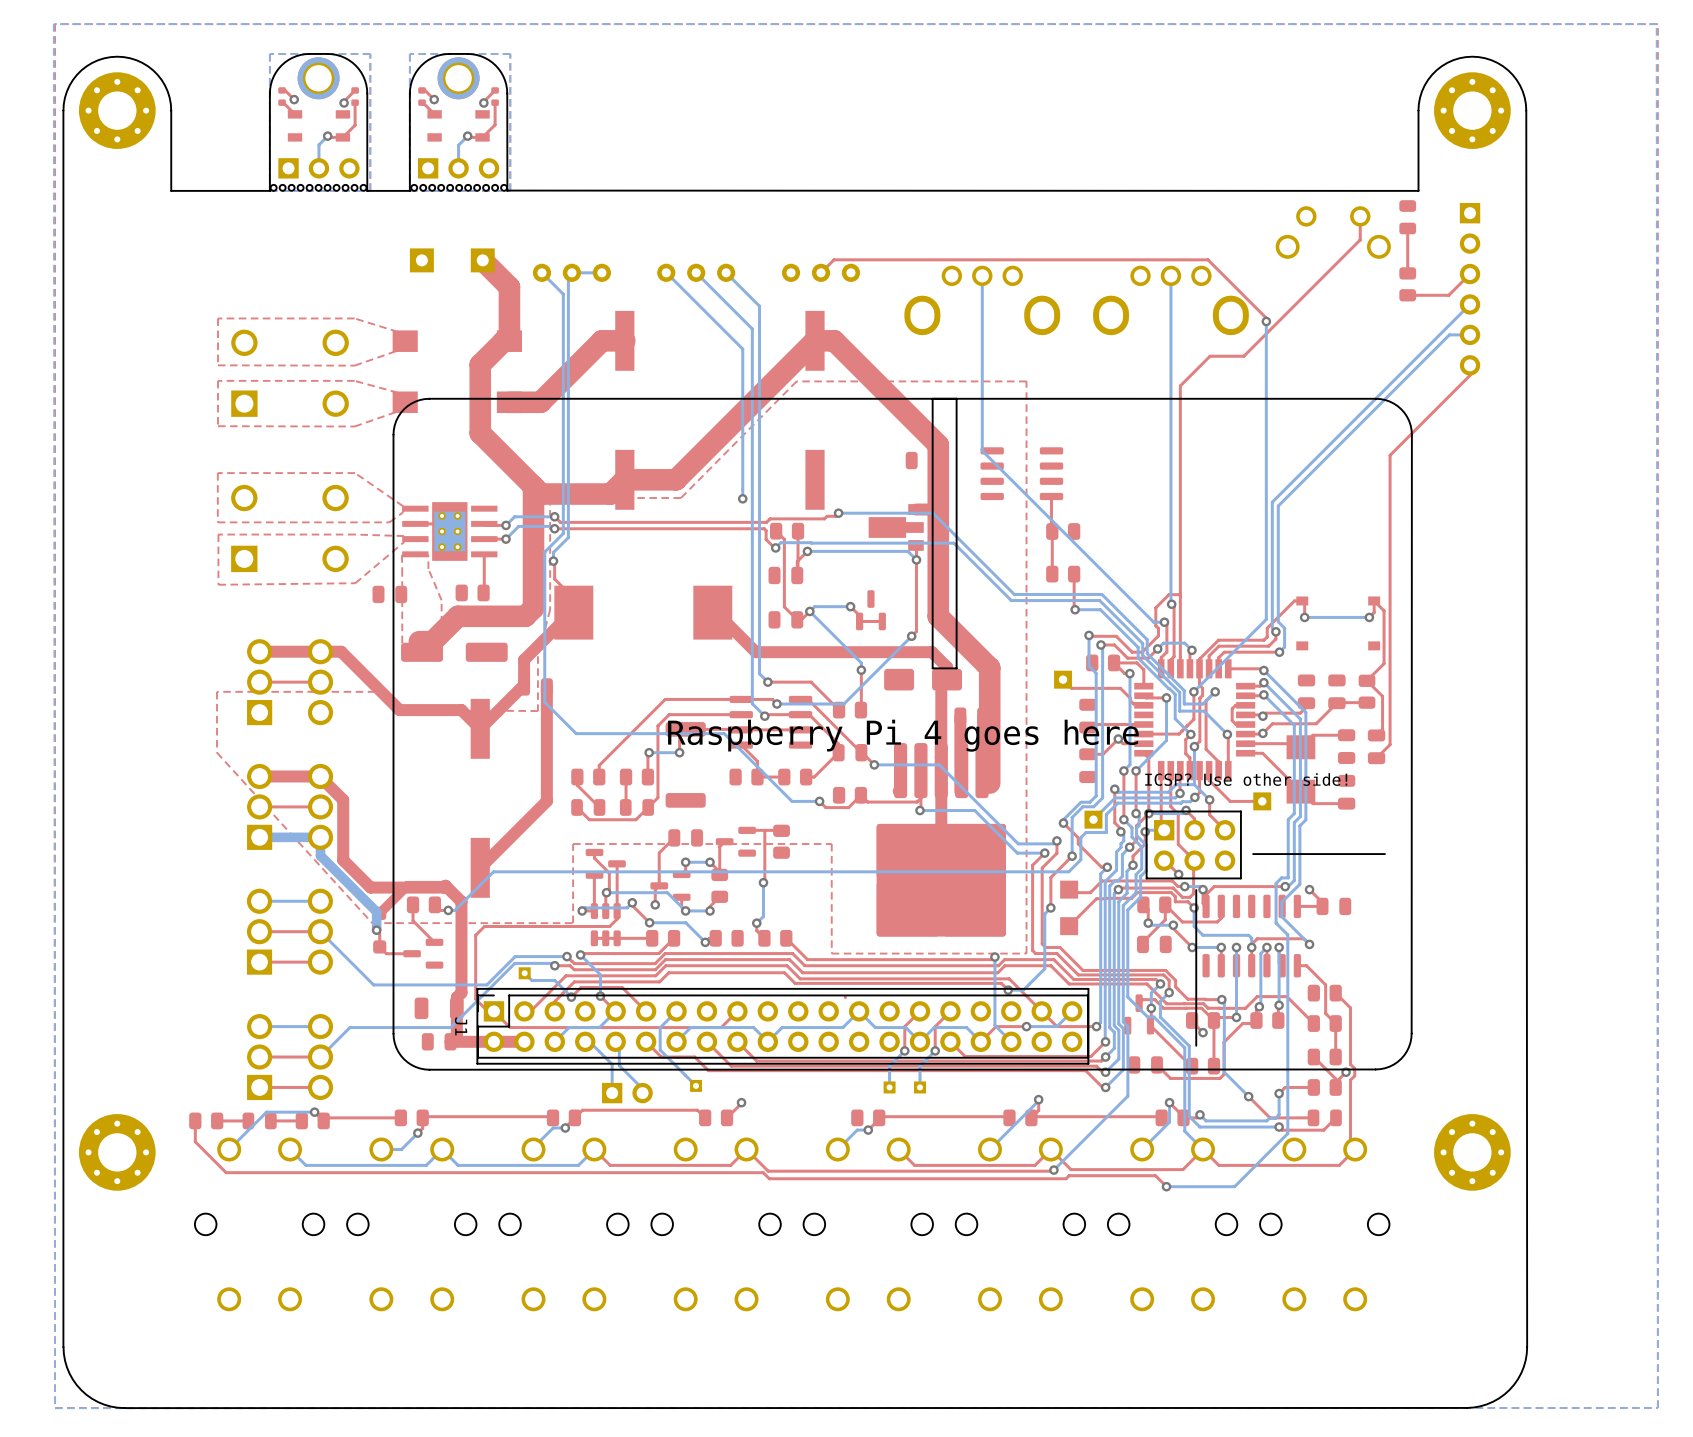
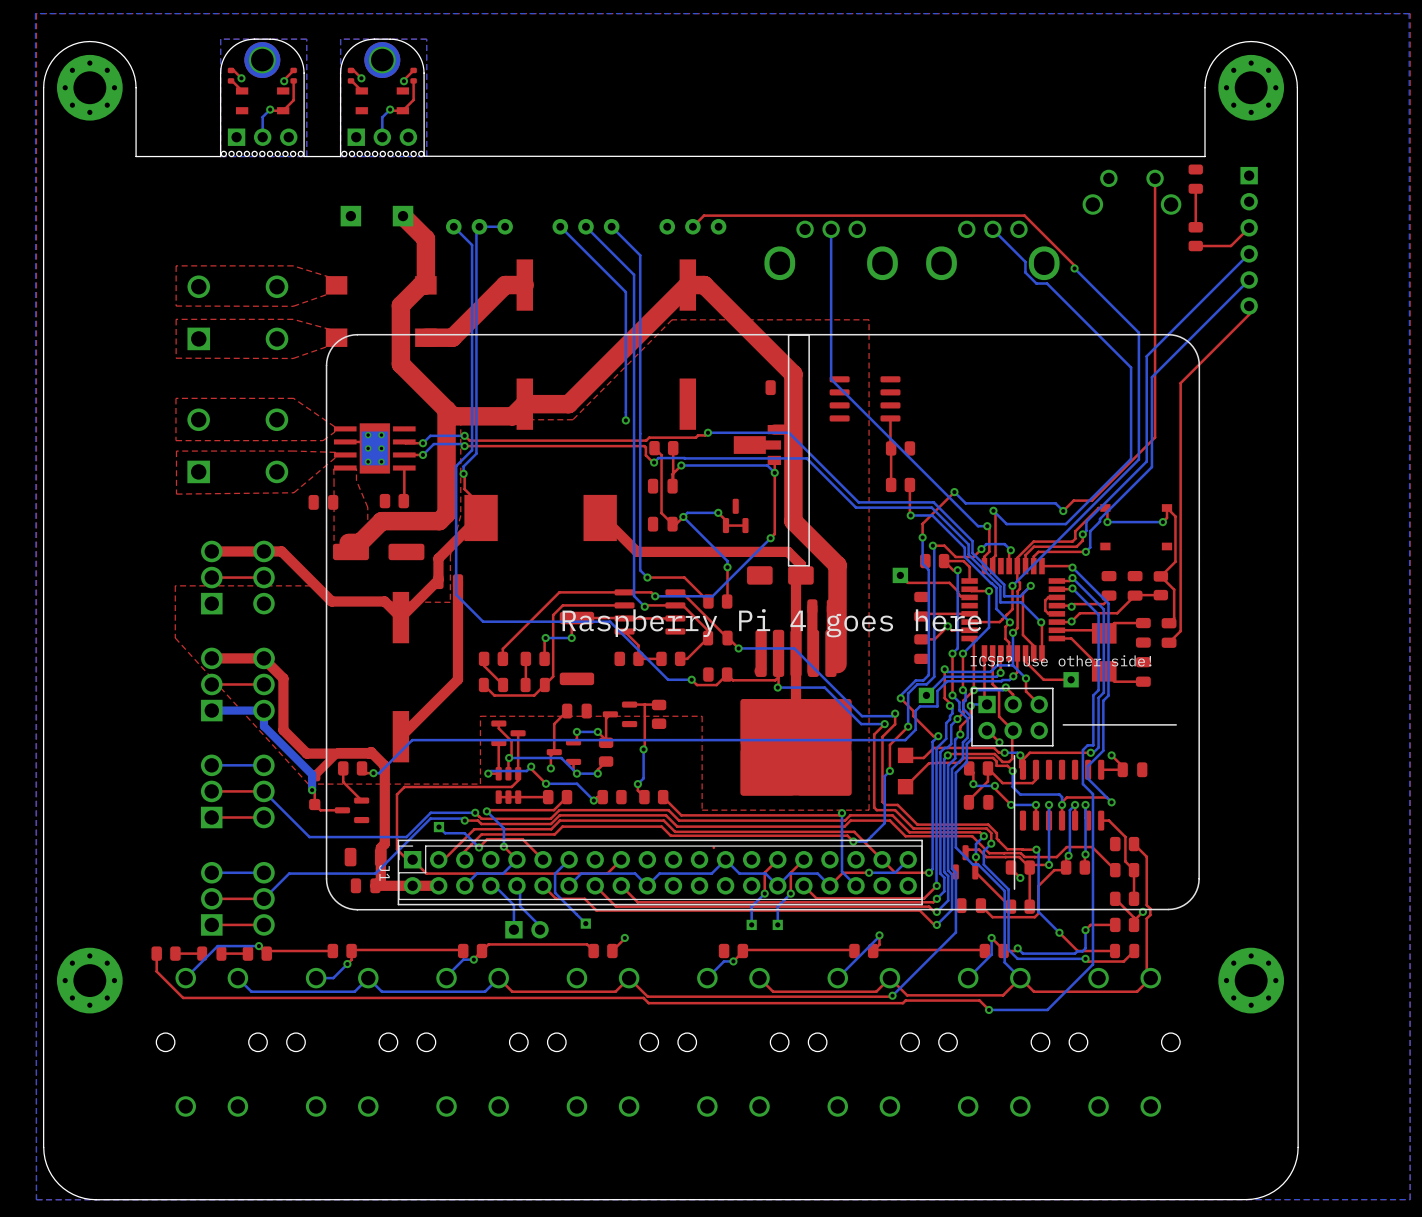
top track: (1360, 239) (1243, 356) (1210, 356) (1180, 385) (1180, 668) -> (1155, 198) (1155, 437) (1091, 500) (1073, 500) (1063, 511)
bottom track: (1170, 275) (1171, 604) -> (992, 229) (1025, 261) (1025, 272) (1036, 283) (1047, 283) (1131, 367) (1131, 458) (1065, 524) (1006, 524) (993, 510)
bottom track: (1266, 321) (1266, 619) -> (1074, 268) (1138, 332) (1138, 459) (1074, 523)
bottom track: (1470, 334) (1449, 334) (1278, 506) (1278, 621) (1284, 628) -> (1249, 279) (1151, 377) (1151, 467) (1090, 531)
bottom track: (1350, 423) (1272, 502) (1272, 628) (1275, 631) -> (1146, 356) (1146, 461) (1086, 521) (1086, 530) (1082, 534)
bottom track: none -> (954, 492) (965, 503) (1055, 503) (1063, 511)
via: none -> (954, 492)
top track: (1180, 594) (1168, 594) (1155, 607) (1155, 625) (1158, 628) (1158, 635) (1142, 652) (1132, 652) (1116, 636) (1089, 635) -> (954, 492) (922, 523) (922, 537)
via: none -> (1063, 511)

